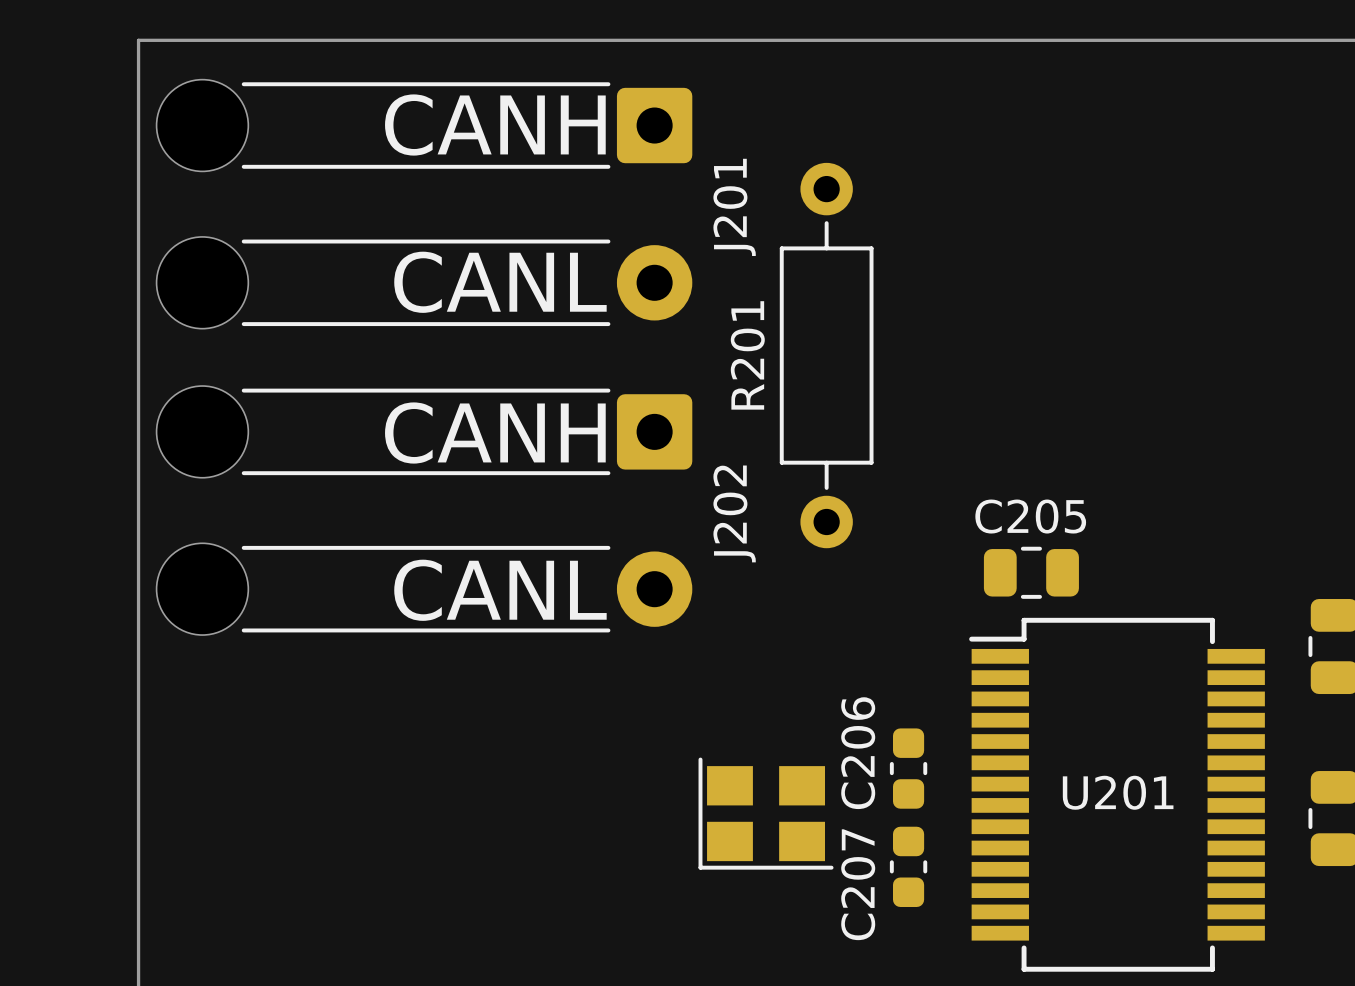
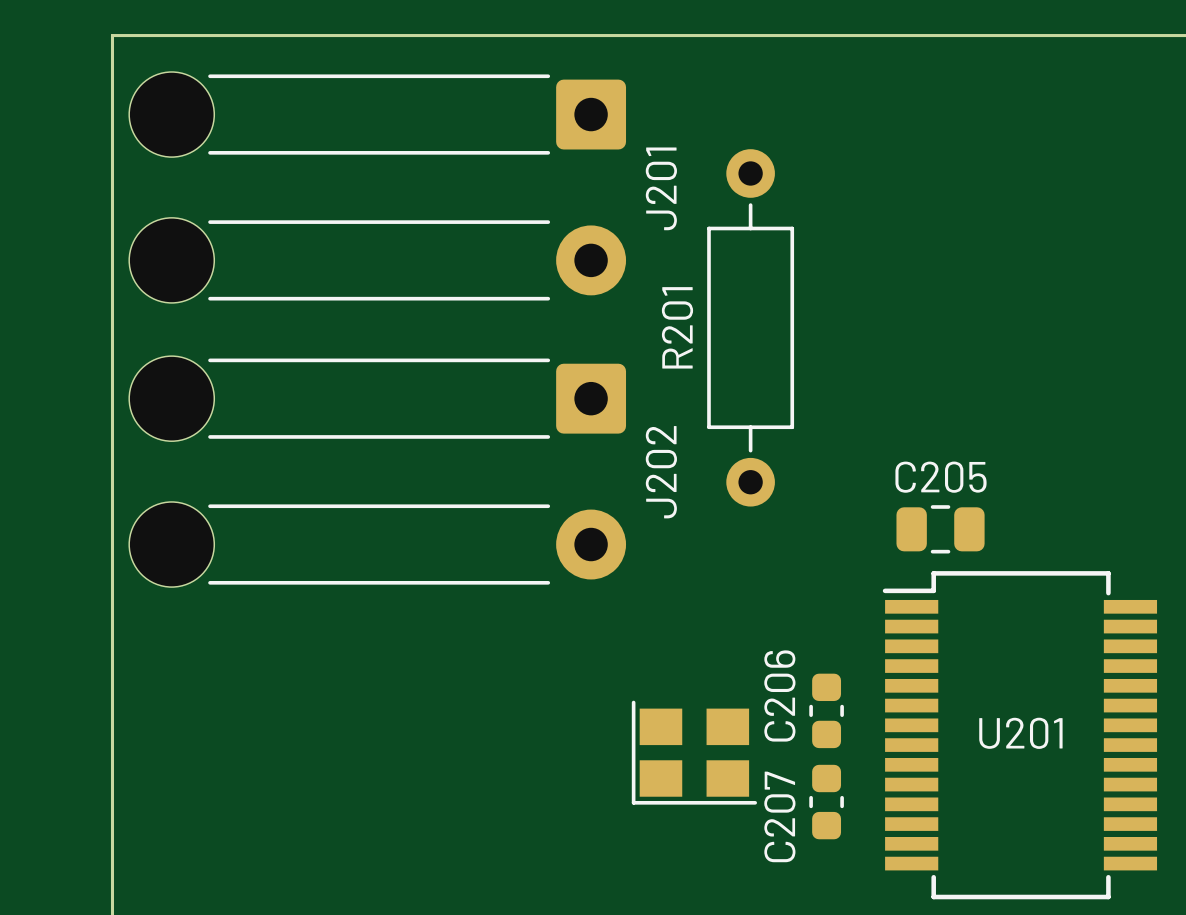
text: CANH (495, 125) -> none
text: CANL (500, 282) -> none
text: CANH (495, 433) -> none
text: CANL (500, 590) -> none

